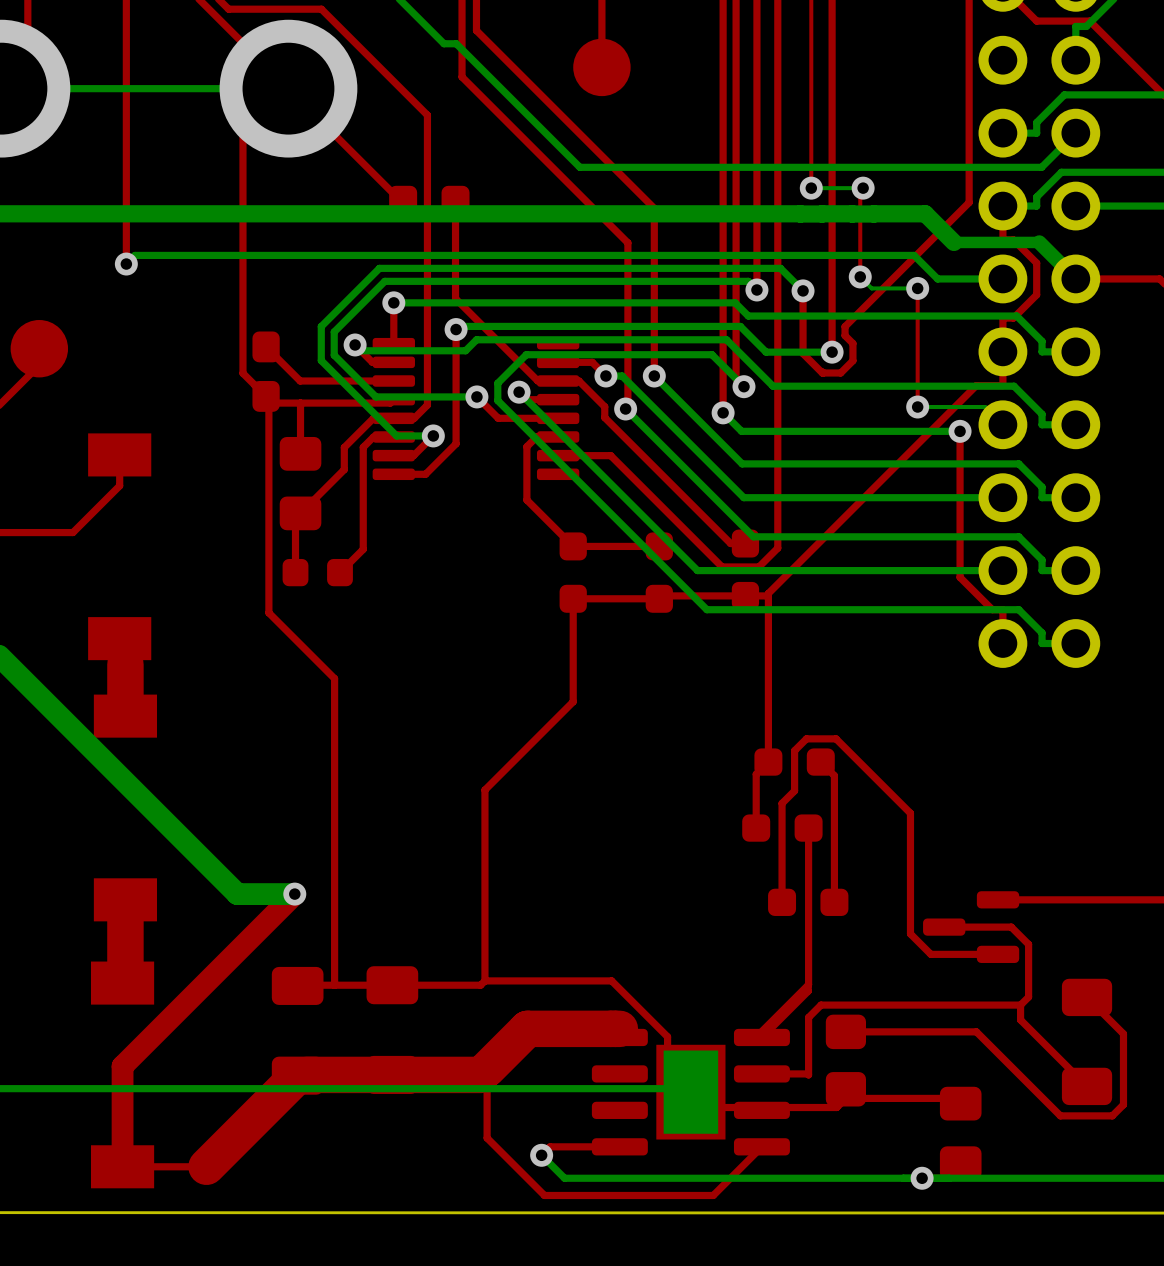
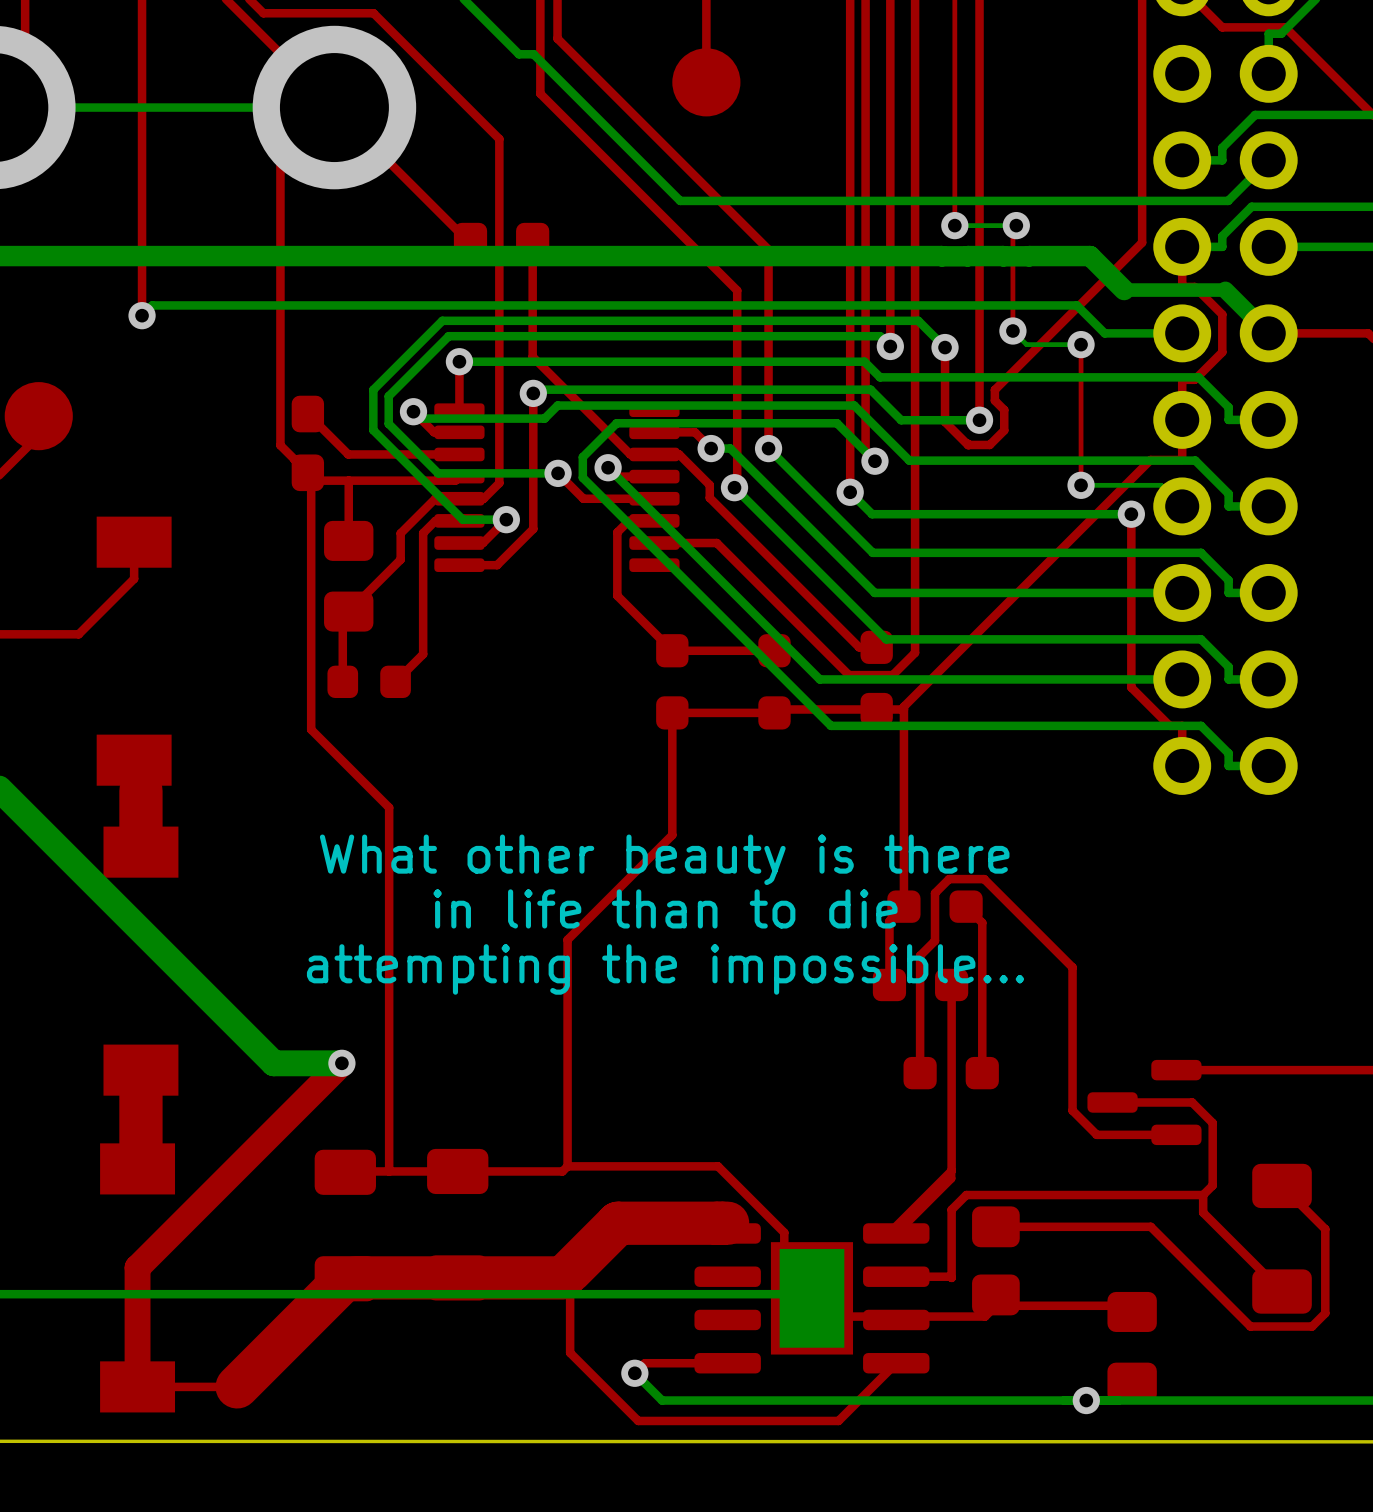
text: none -> What other beauty is there (664, 859)
text: none -> in life than to die (665, 908)
text: none -> attempting the impossible... (665, 969)

